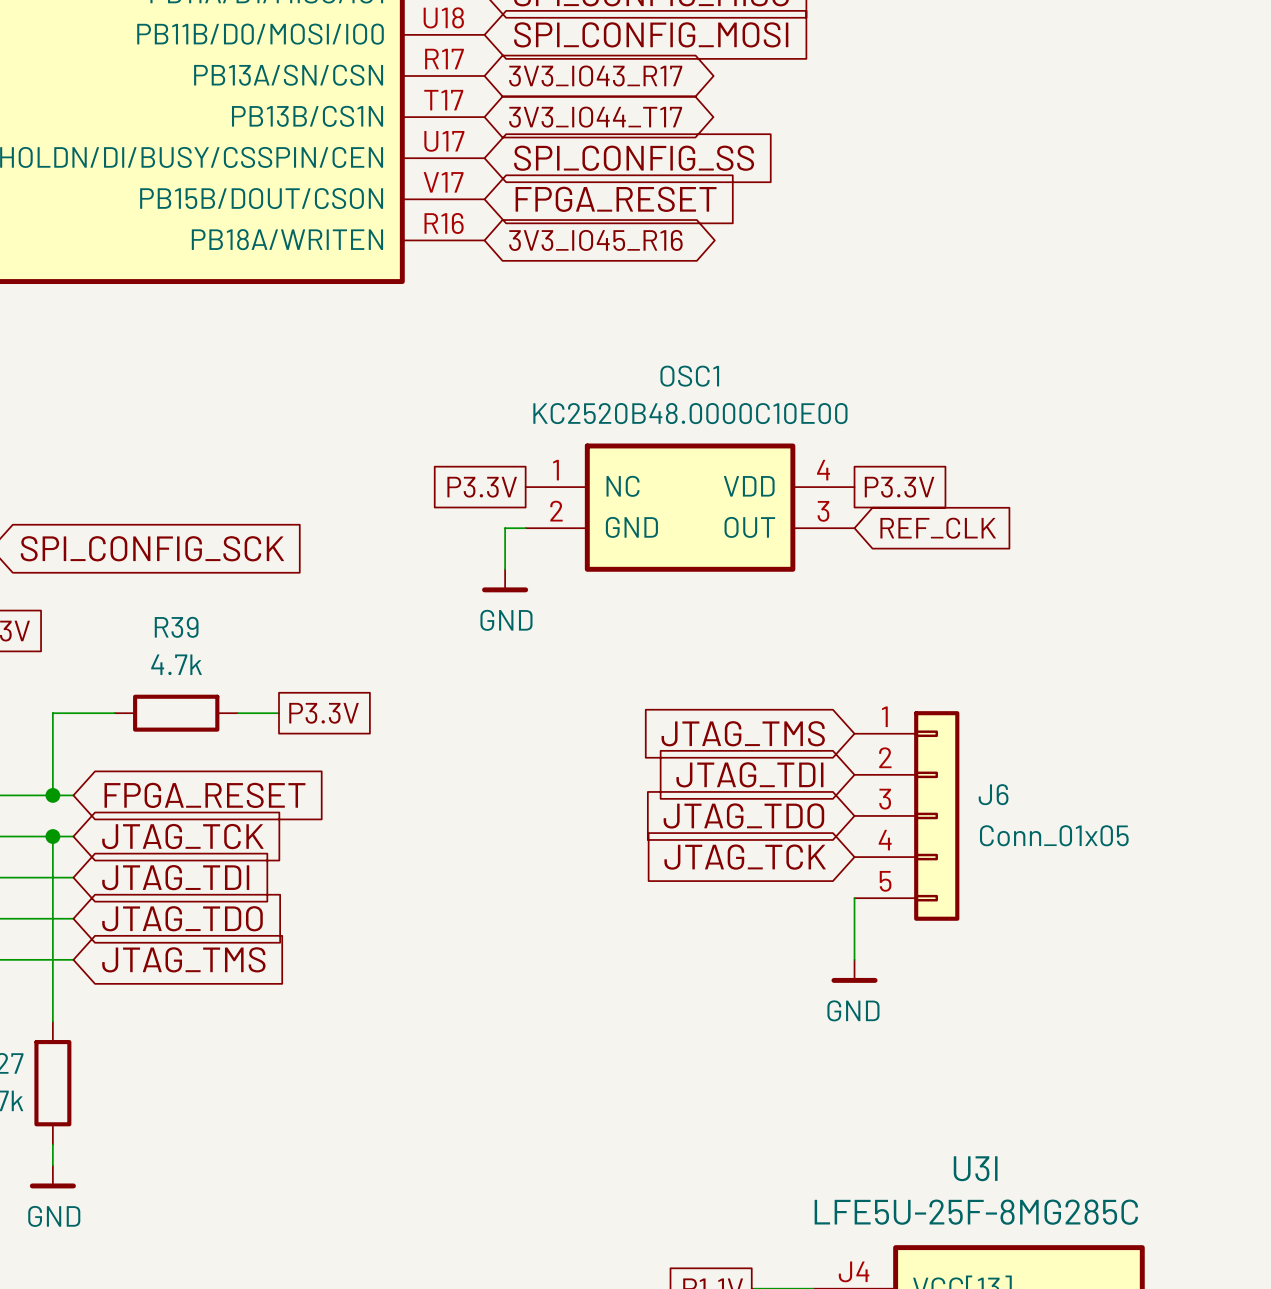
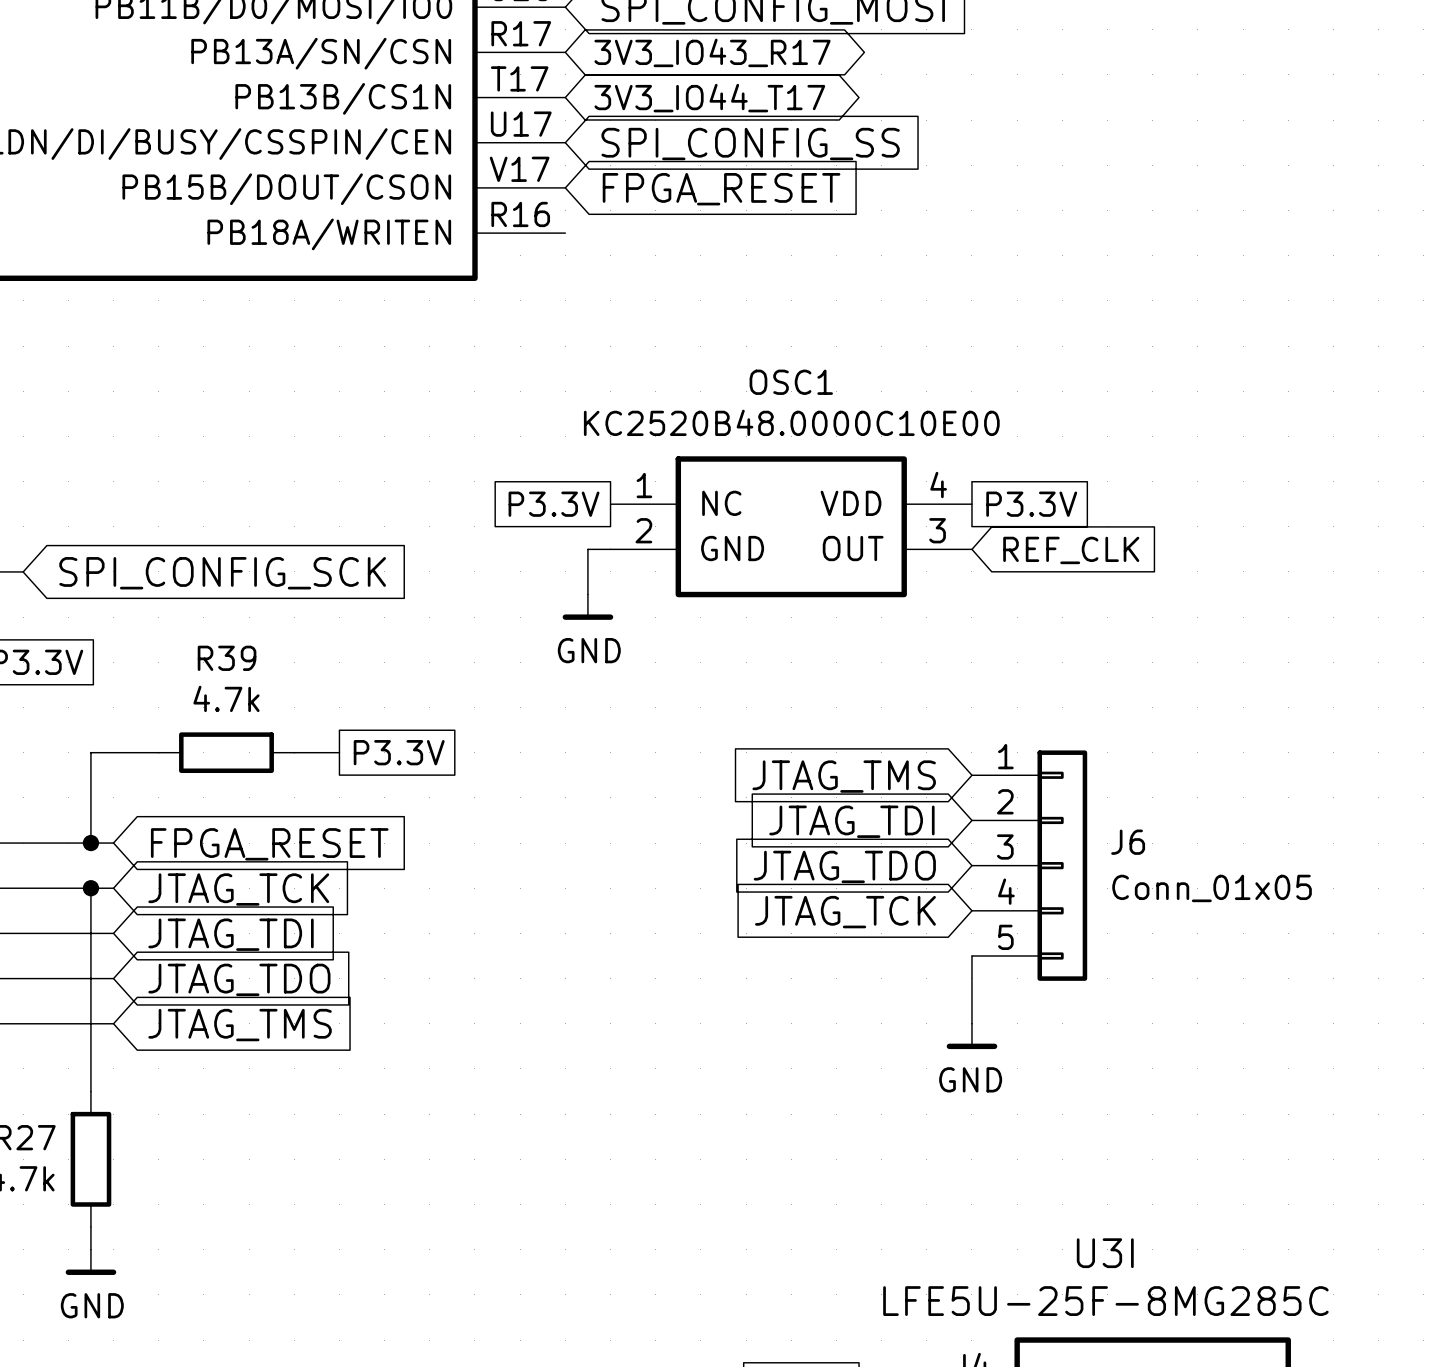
global label: 3V3_IO45_R16 (595, 240) -> none

